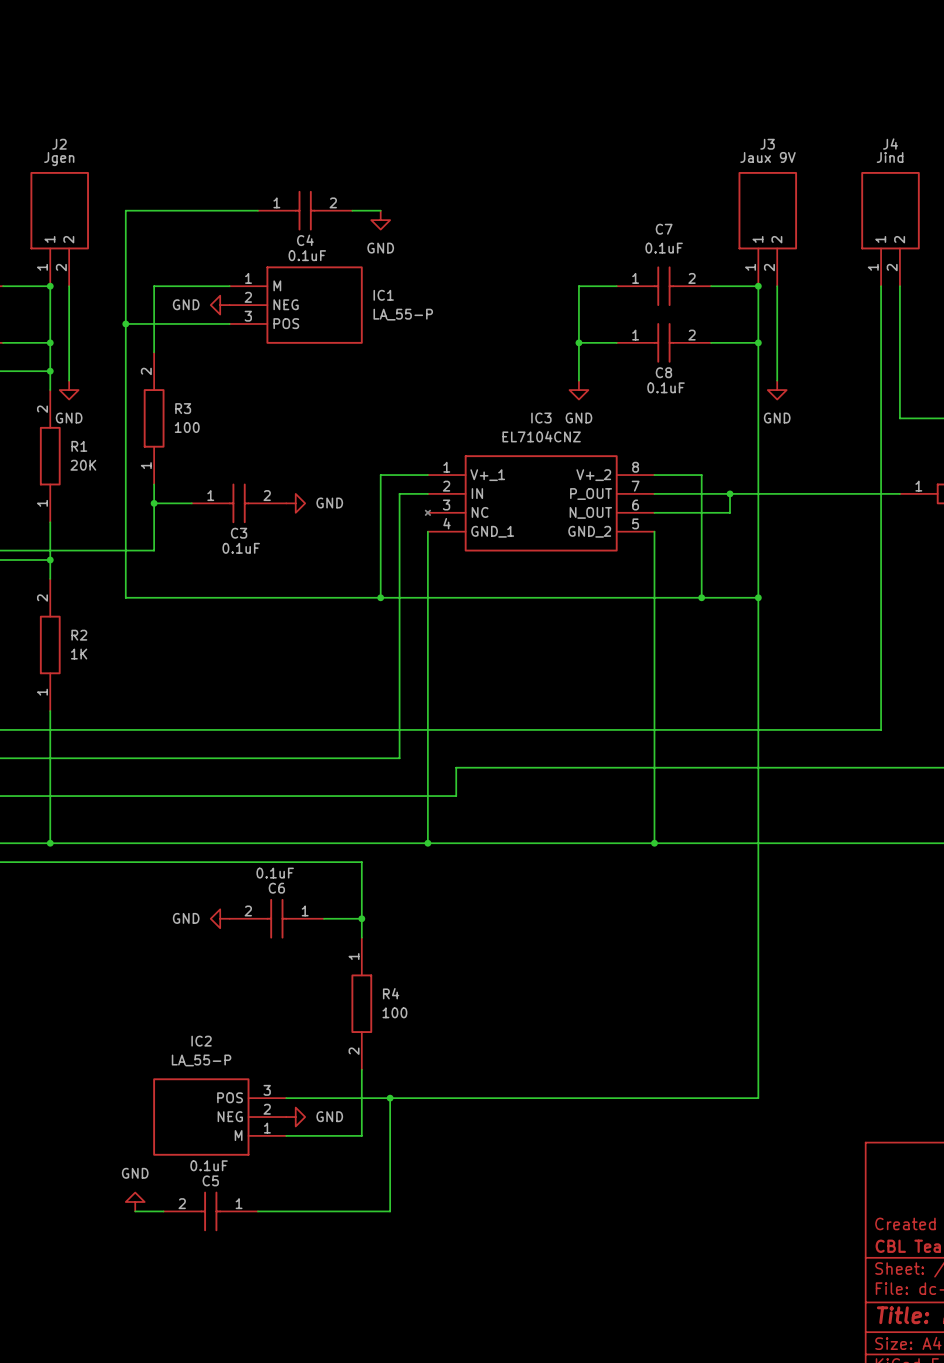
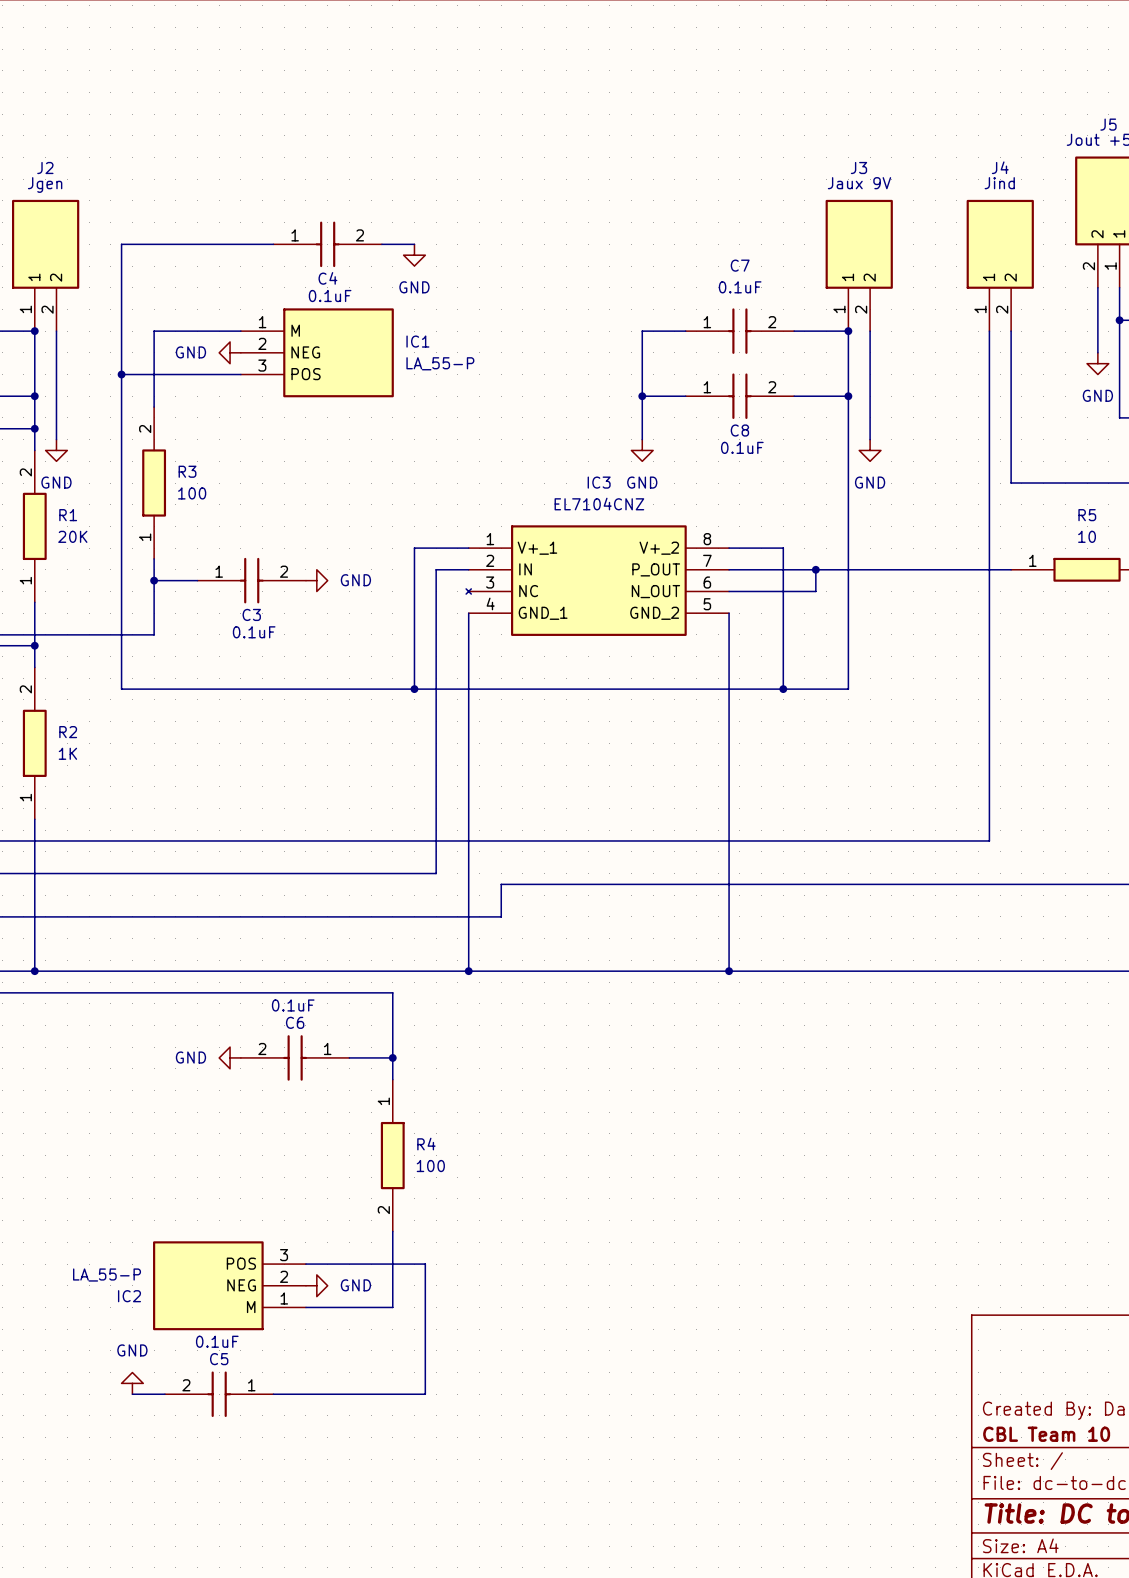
wire: (758, 597) (758, 1098) (390, 1098) -> none
junction: (758, 597) -> none
IC2 name position: IC2 (201, 1041) -> IC2 (129, 1296)
IC2 value position: LA_55-P (201, 1060) -> LA_55-P (107, 1275)
junction: (390, 1098) -> none

